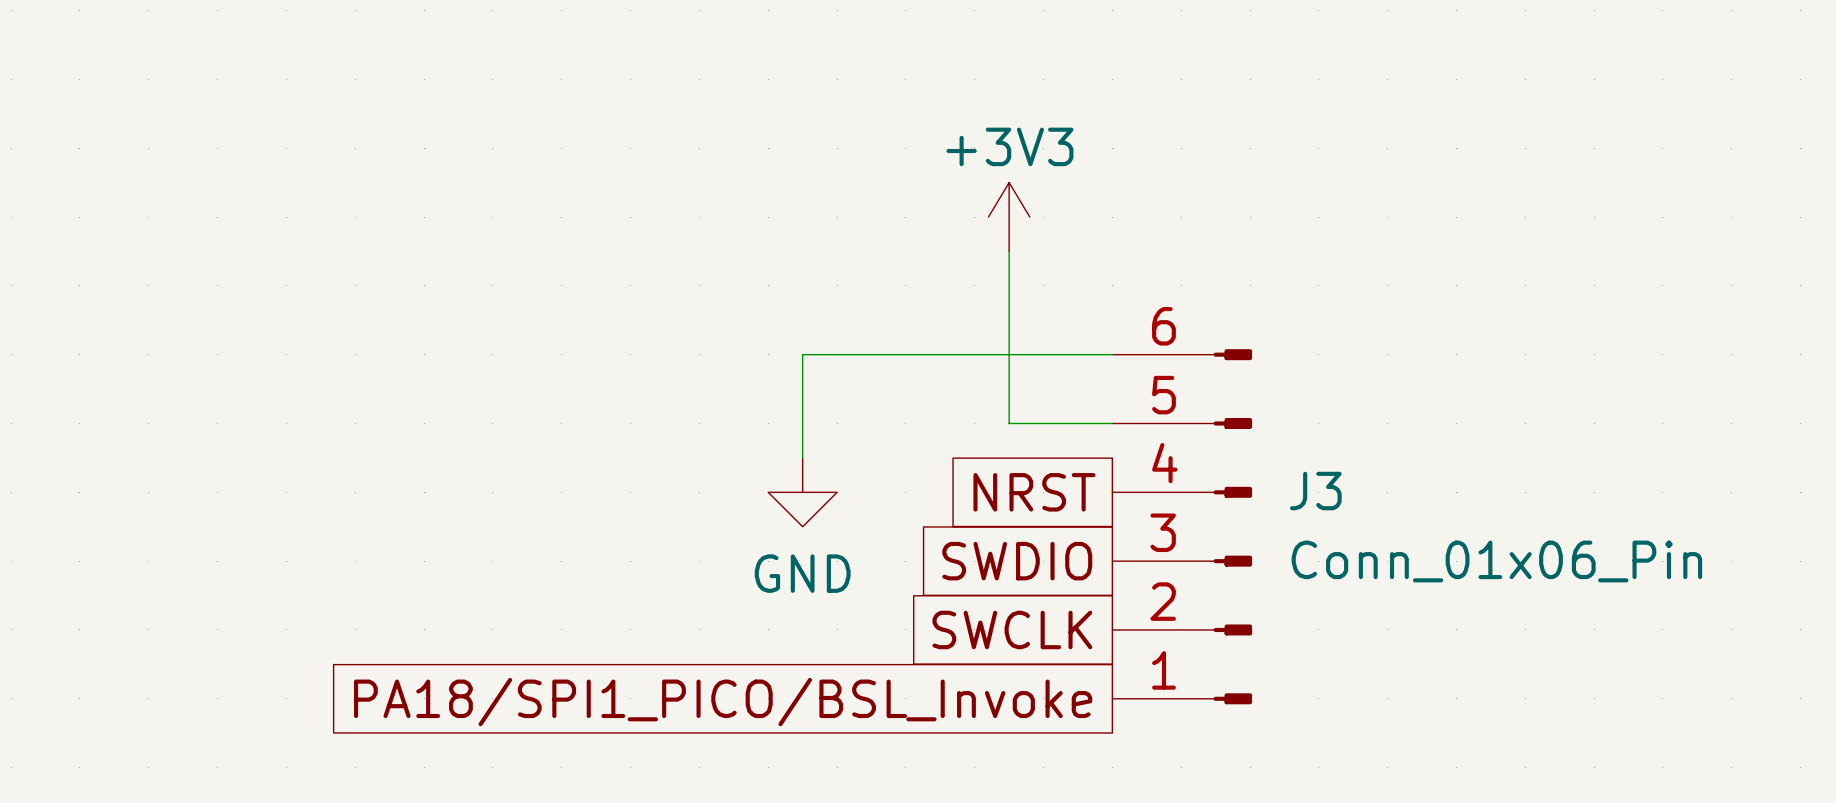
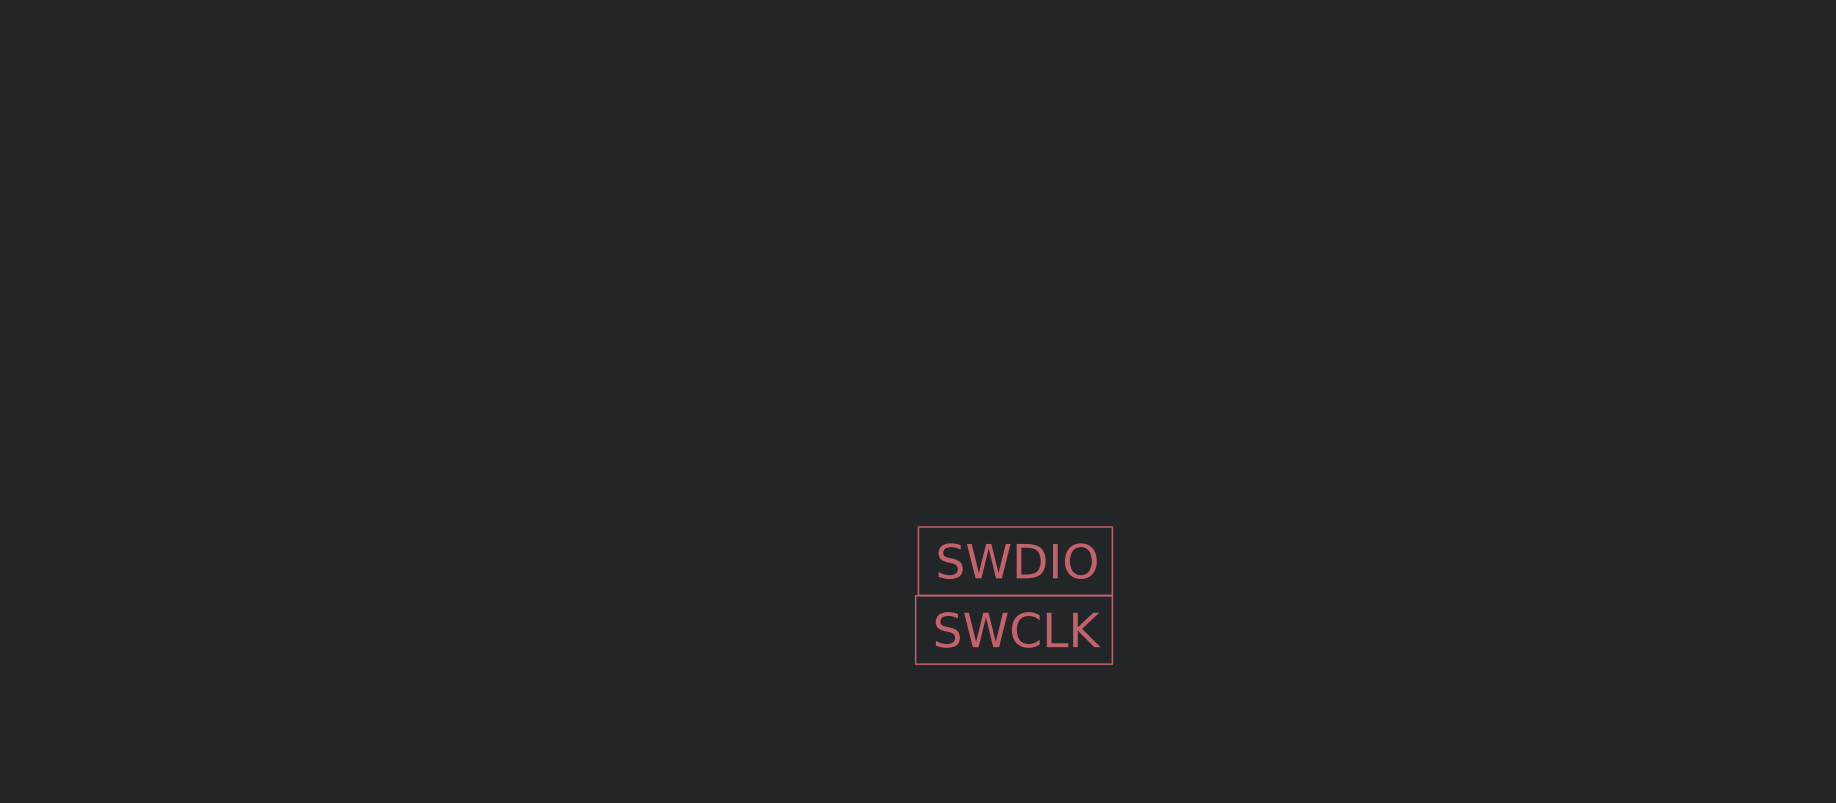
power symbol: +3V3 (1009, 217) -> none
wire: (1009, 251) (1009, 423) (1112, 423) -> none
wire: (1112, 354) (802, 354) (802, 457) -> none
power symbol: GND (802, 492) -> none
global label: NRST (1034, 492) -> none
J3: Conn_01x06_Pin (1182, 526) -> none
global label: PA18/SPI1_PICO/BSL_Invoke (723, 702) -> none

